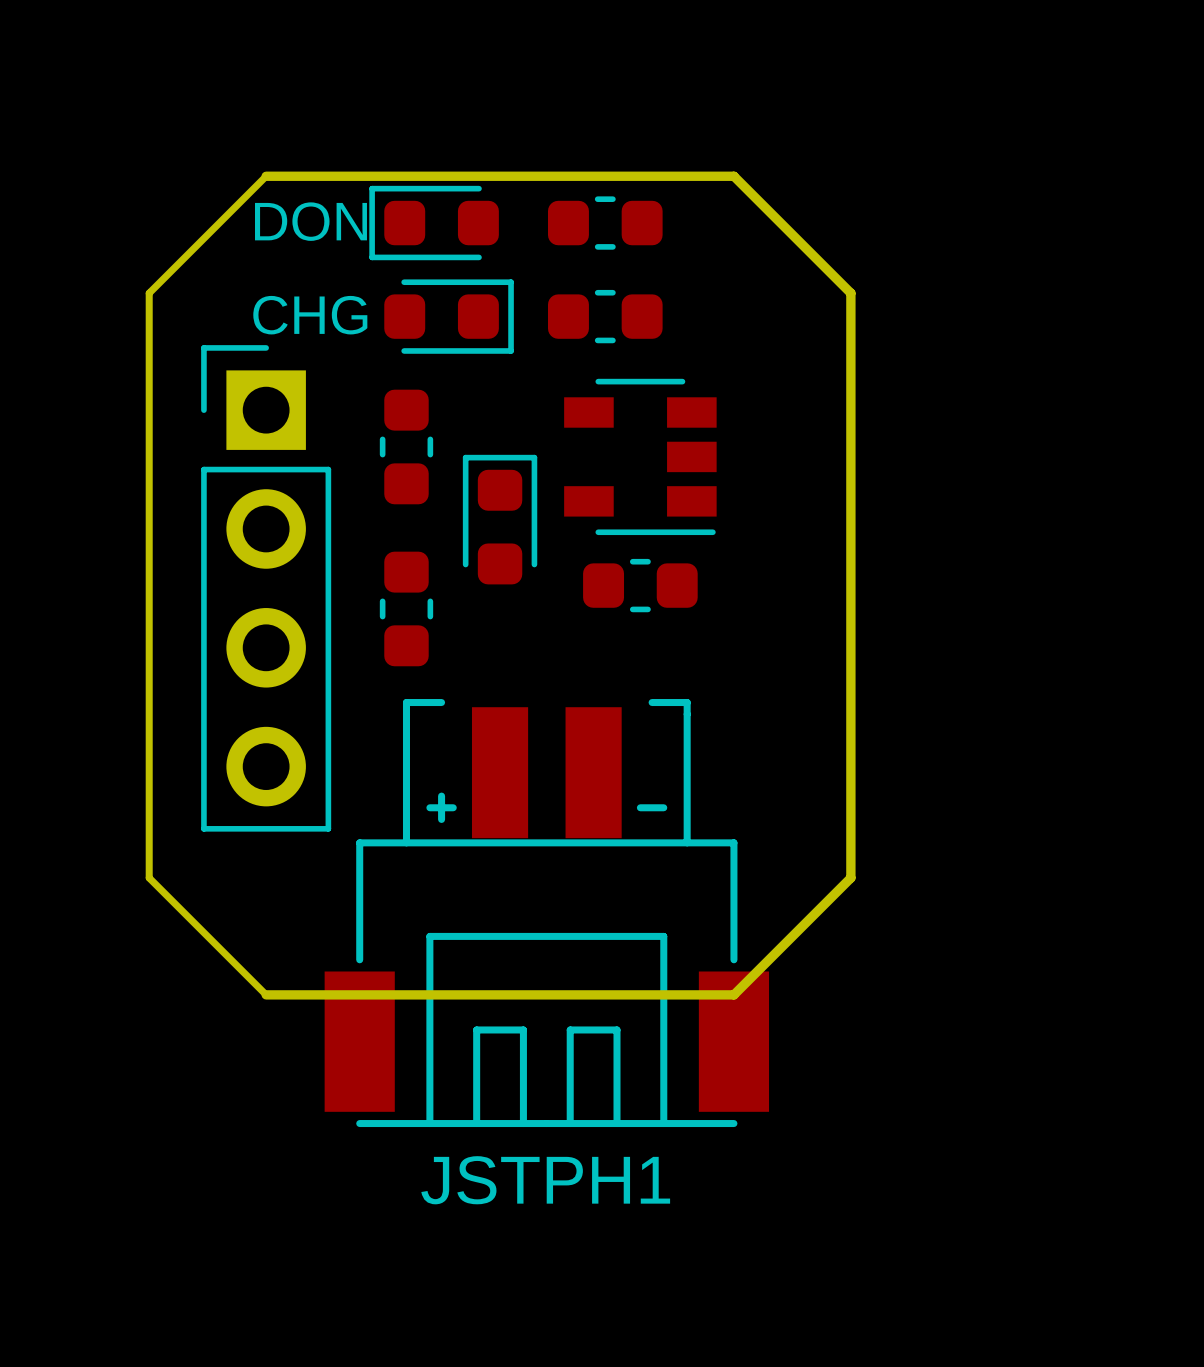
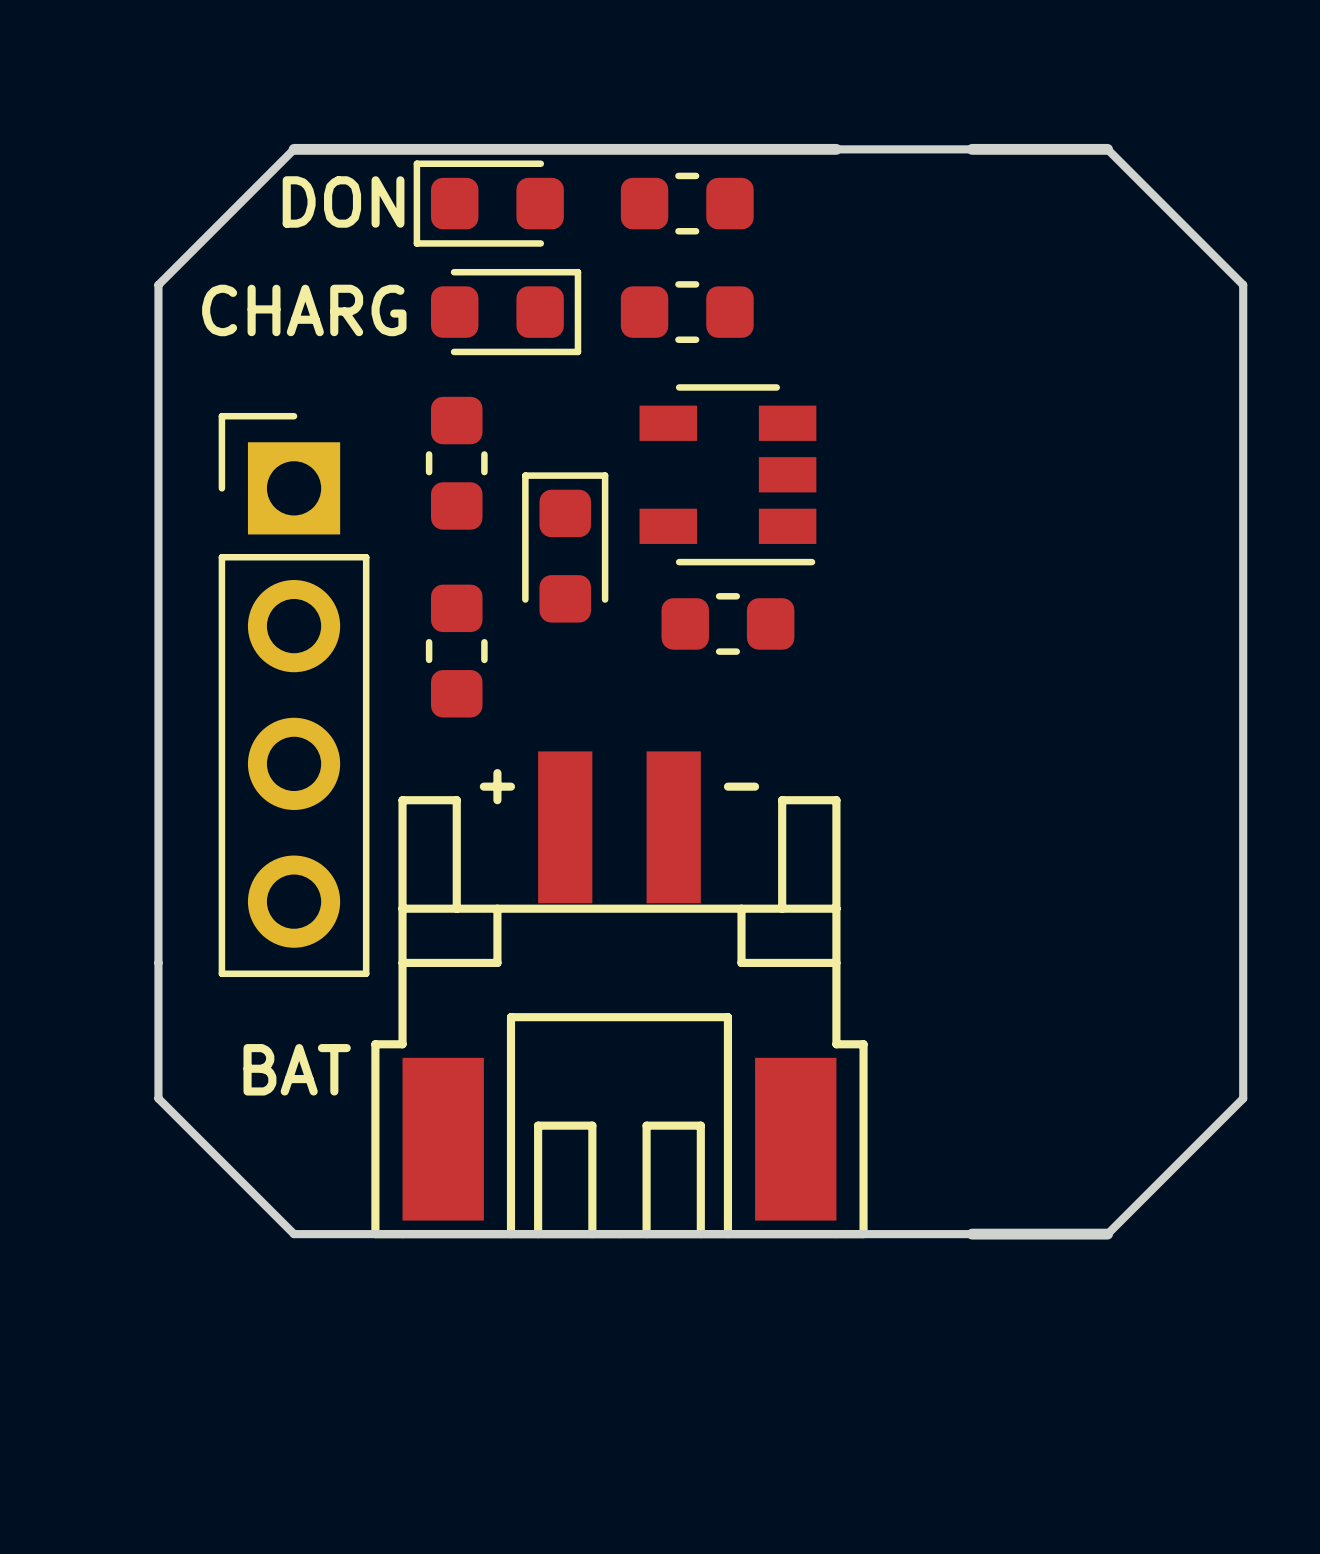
board edge: (733, 176) (850, 293) (850, 877) (733, 994) (266, 994) (149, 877) -> (836, 149) (1107, 149) (1243, 284) (1243, 1098) (1107, 1234) (294, 1234) (158, 1098) (158, 962)
text: CHG (310, 315) -> CHARG (304, 310)
part position: (266, 588) -> (294, 695)
part: none -> (619, 994)
JSTPH1: (546, 913) -> none
text: none -> BAT (297, 1069)

